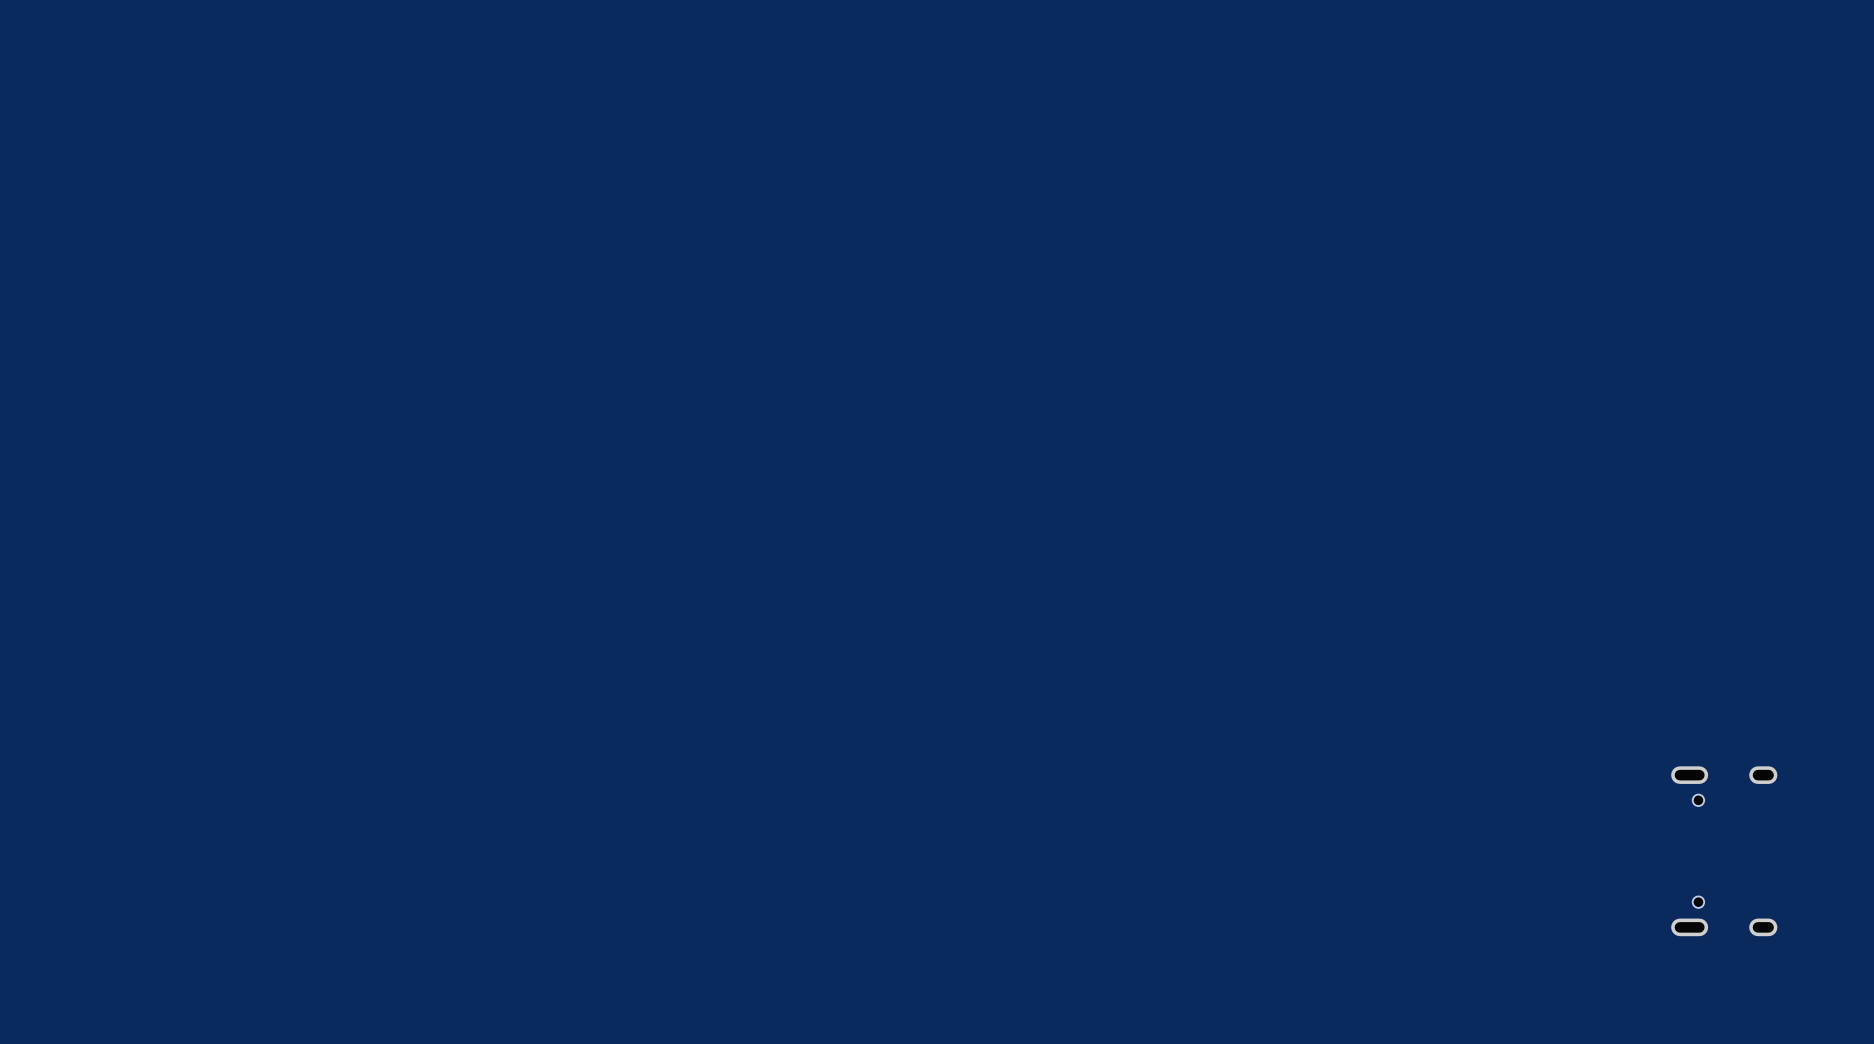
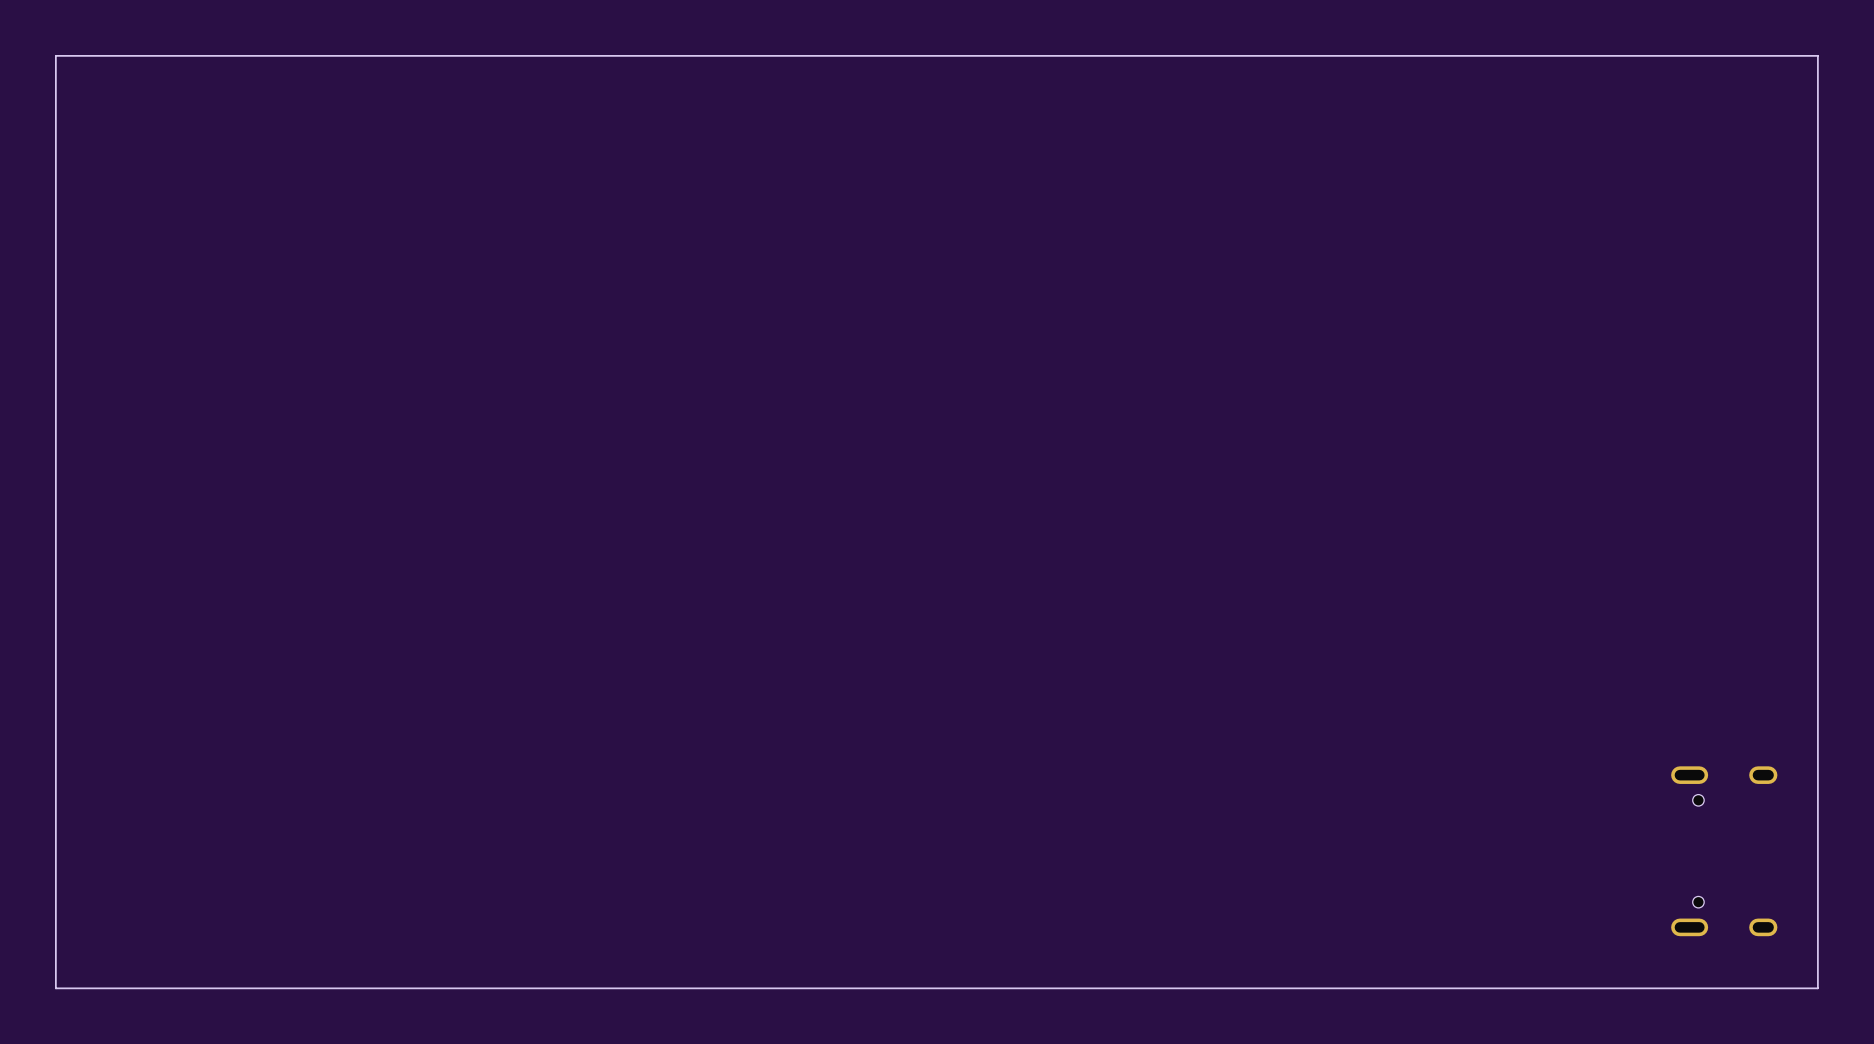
board edge: none -> (1817, 55) (55, 55) (55, 988) (1817, 988) (1817, 55)

